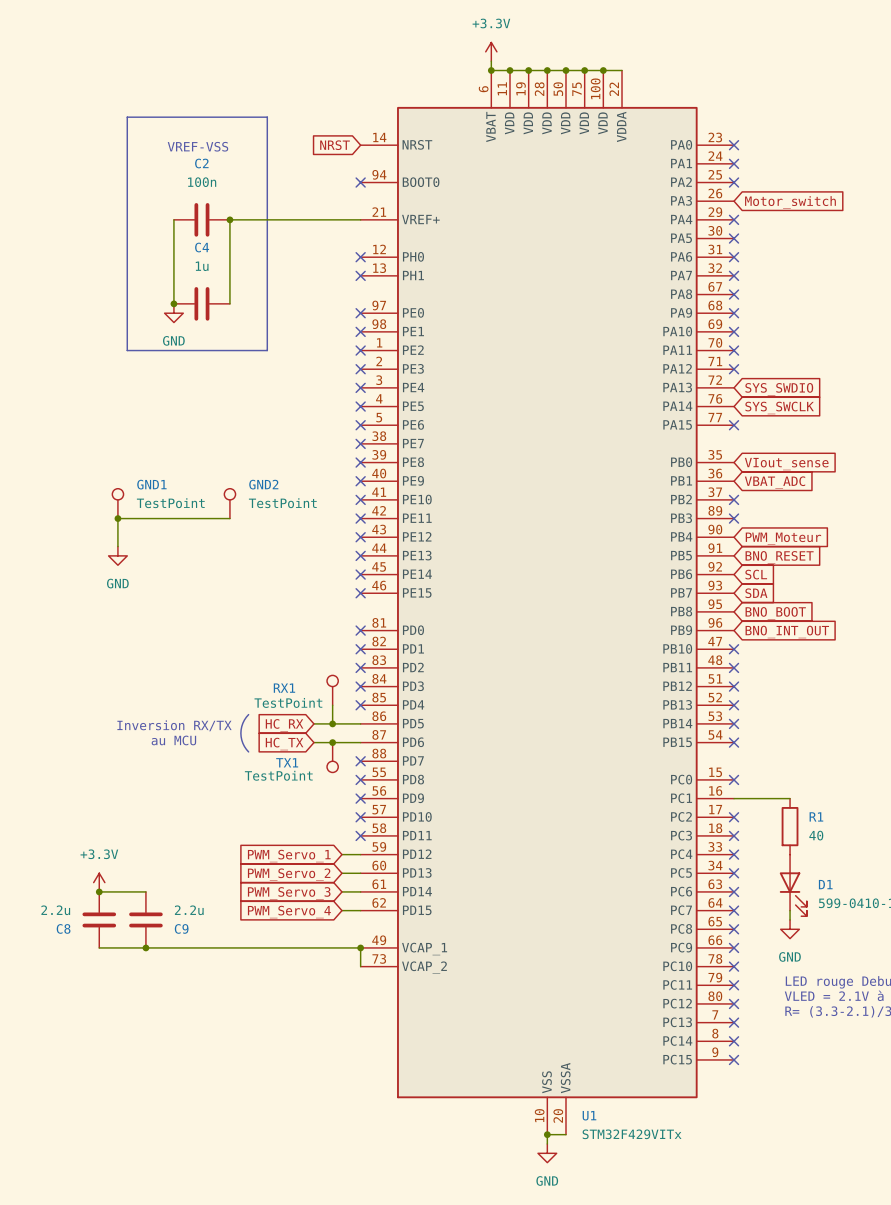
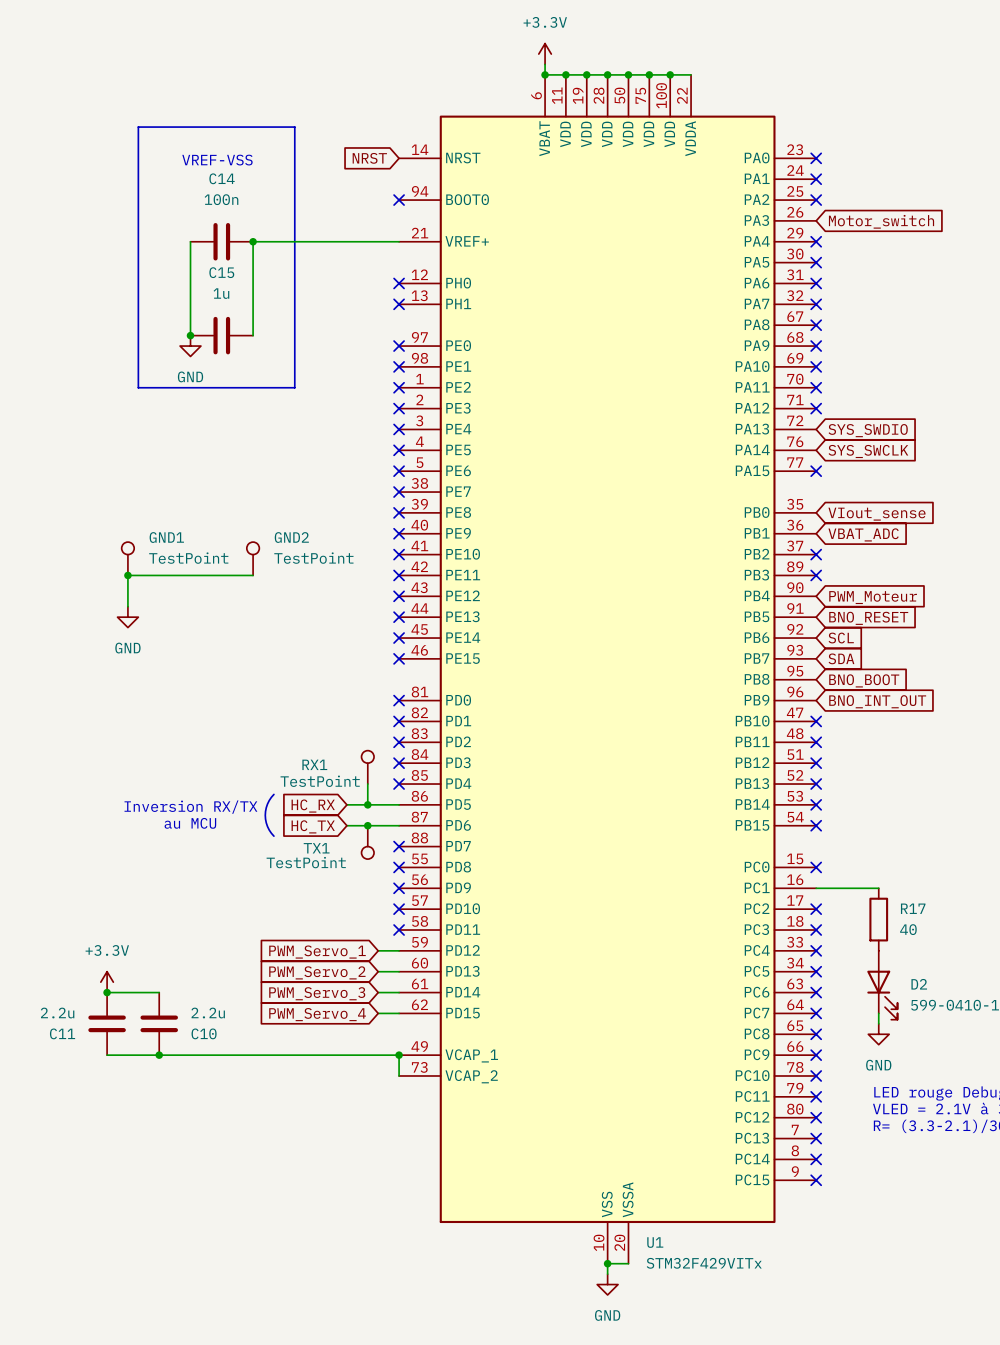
C2 name: C2 (201, 163) -> C14 (222, 178)
C4 name: C4 (202, 247) -> C15 (221, 272)
R1 name: R1 (816, 816) -> R17 (913, 908)
D1 name: D1 (825, 884) -> D2 (919, 984)
C8 name: C8 (63, 928) -> C11 (62, 1033)
C9 name: C9 (181, 928) -> C10 (204, 1033)

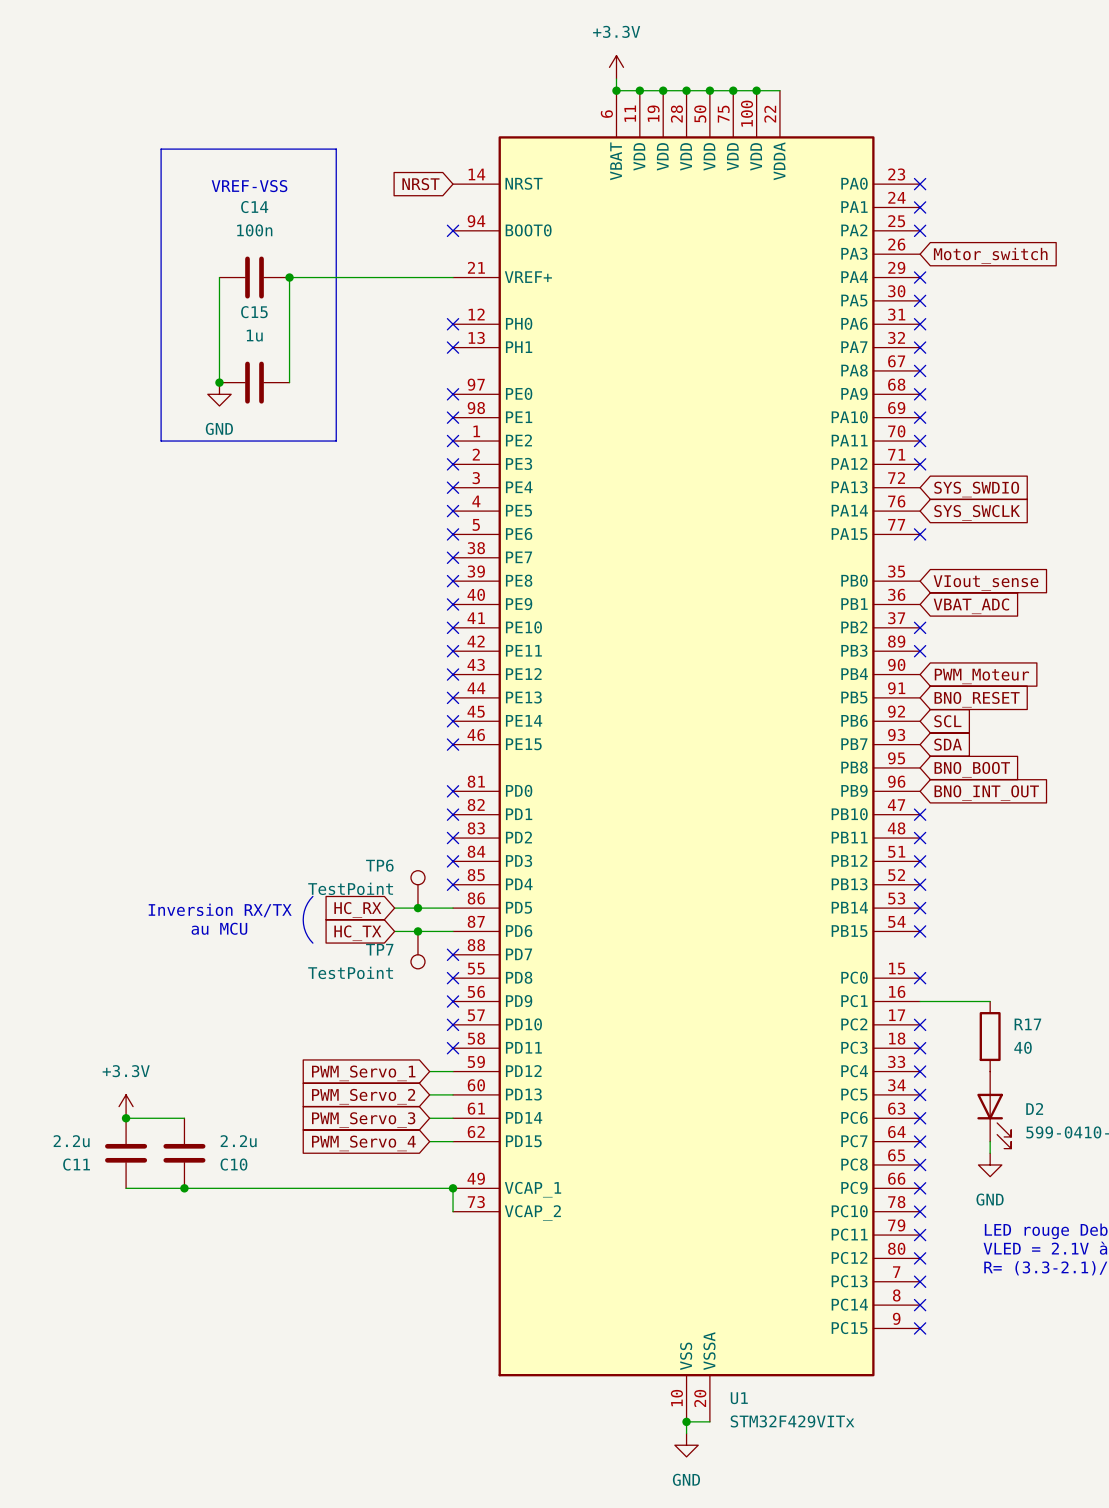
GND1: TestPoint (127, 558) -> none
GND2: TestPoint (253, 558) -> none
junction: (127, 575) -> none
wire: (253, 575) (127, 575) (127, 606) -> none
power symbol: GND (127, 617) -> none
RX1: TestPoint (367, 767) -> none
TP6: none -> TestPoint (417, 889)
TX1 name: TX1 (316, 848) -> TP7 (379, 949)

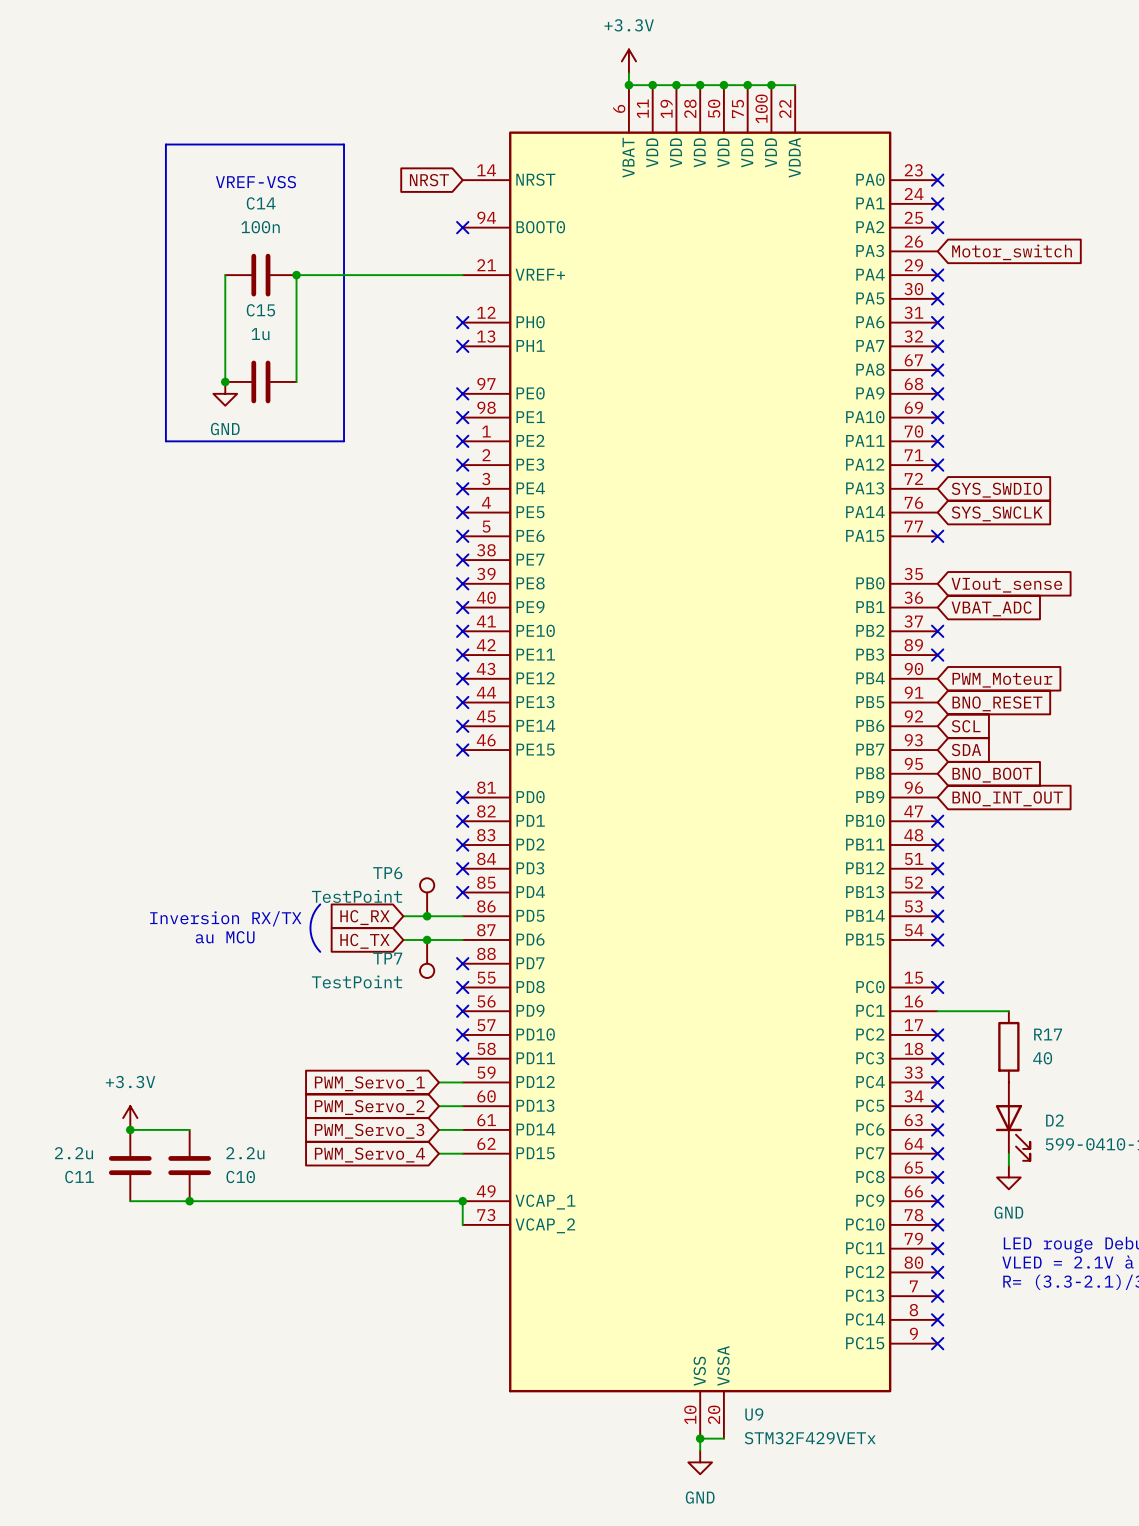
U1 name: U1 (739, 1398) -> U9 (754, 1414)
U1 value: STM32F429VITx (792, 1421) -> STM32F429VETx (810, 1438)

